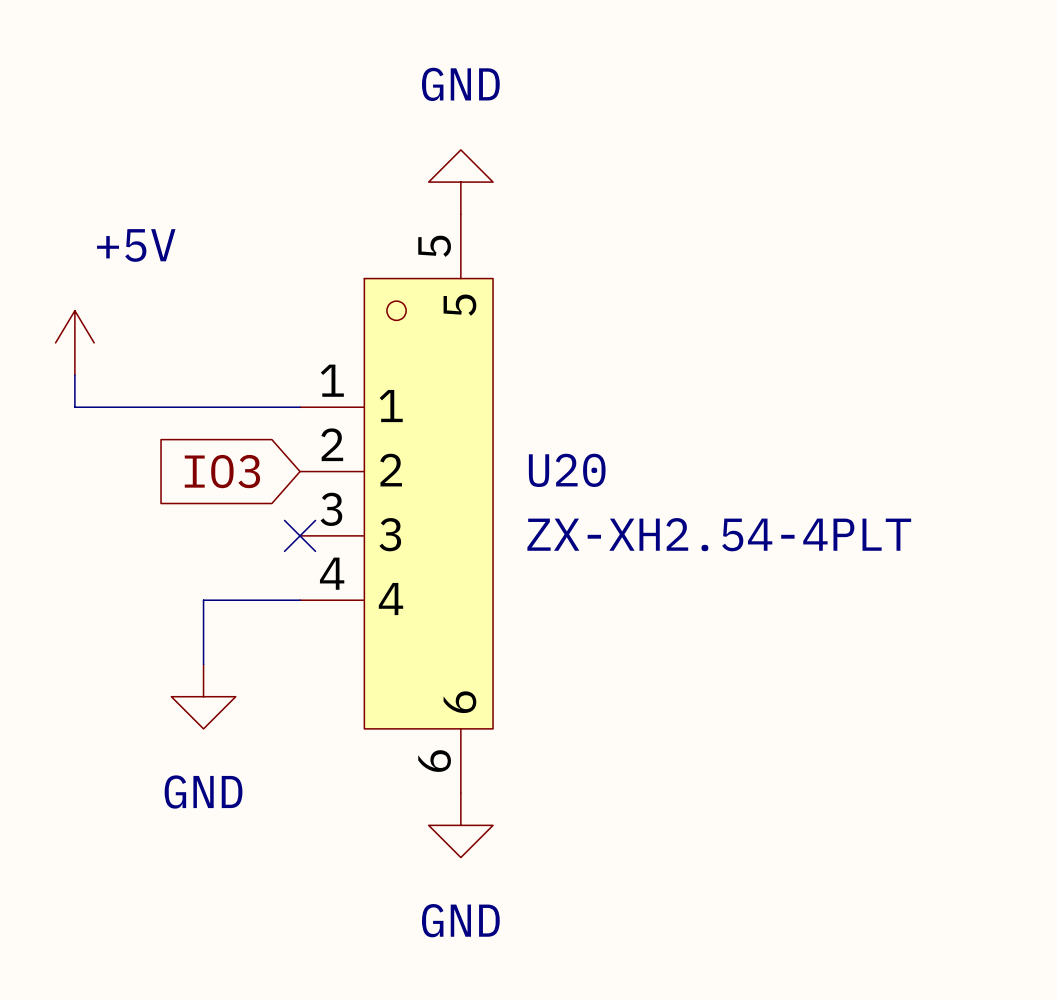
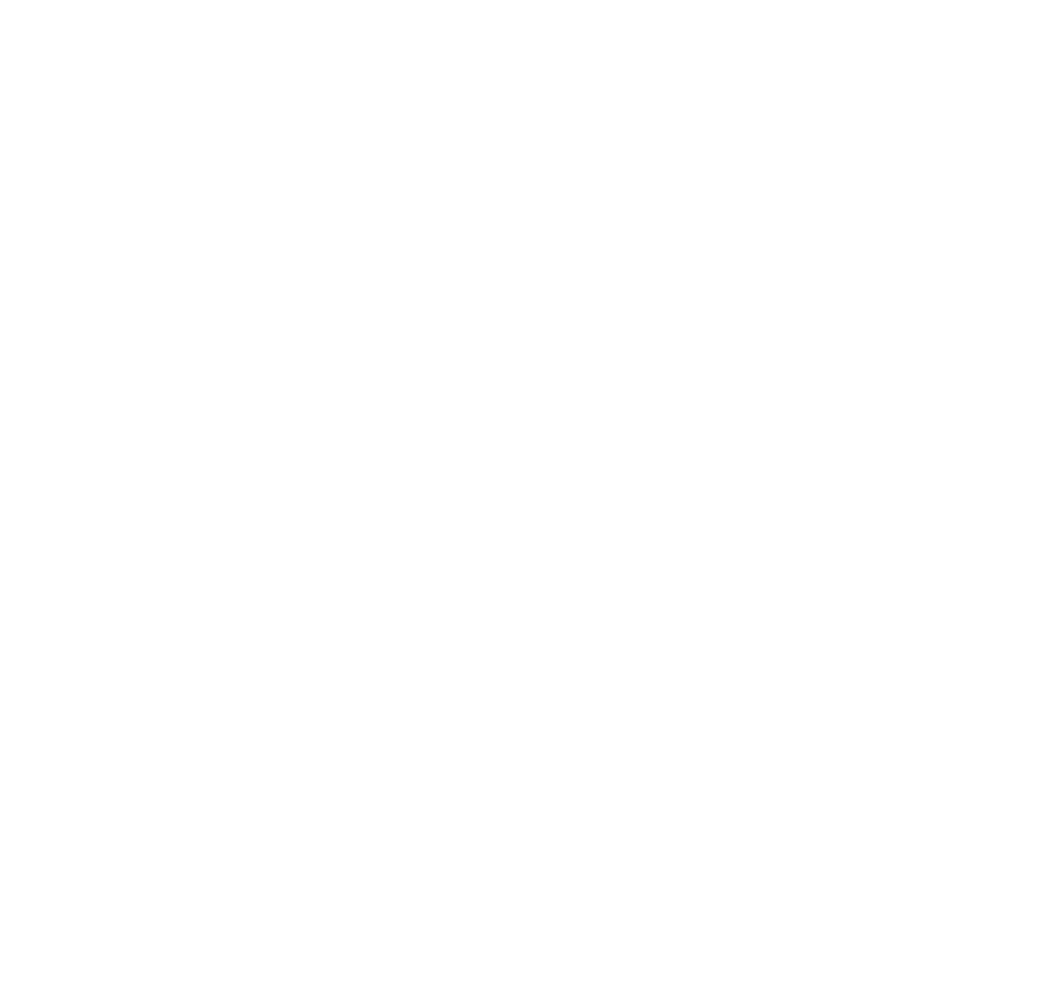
power symbol: GND (460, 182) -> none
power symbol: +5V (74, 342) -> none
wire: (74, 375) (74, 407) (300, 407) -> none
global label: IO3 (222, 471) -> none
U20: ZX-XH2.54-4PLT (396, 503) -> none
no-connect mark: (300, 535) -> none
wire: (300, 600) (203, 600) (203, 664) -> none
power symbol: GND (203, 696) -> none
power symbol: GND (460, 825) -> none

